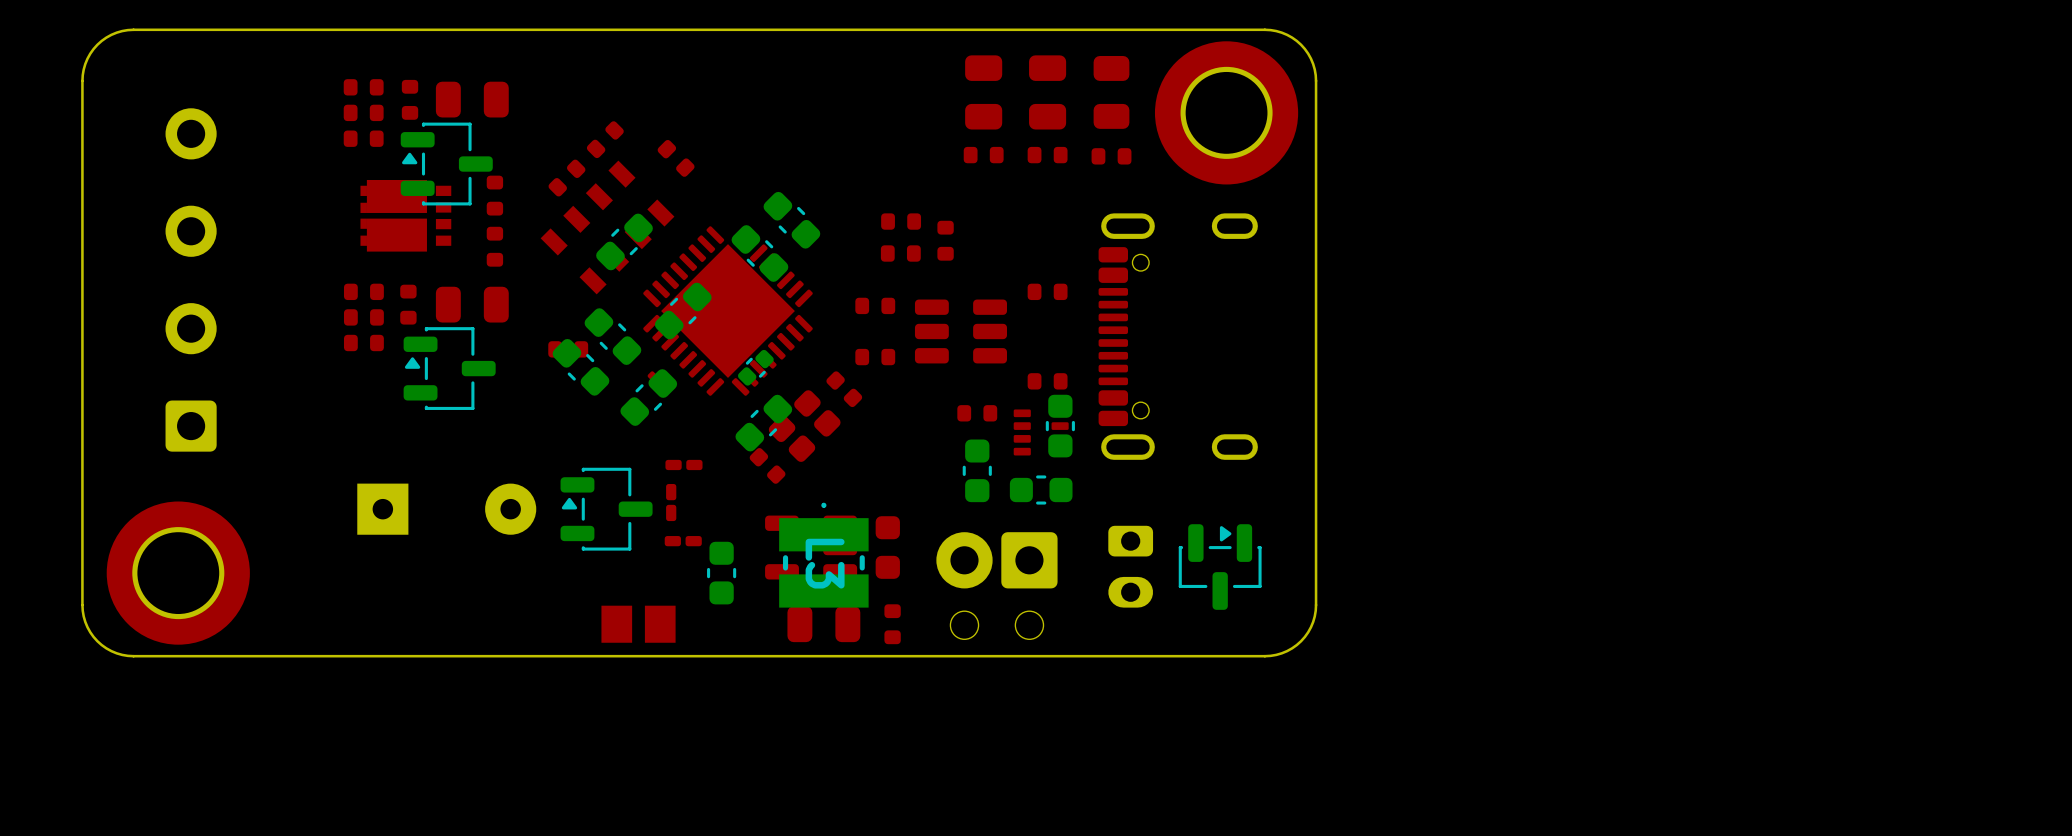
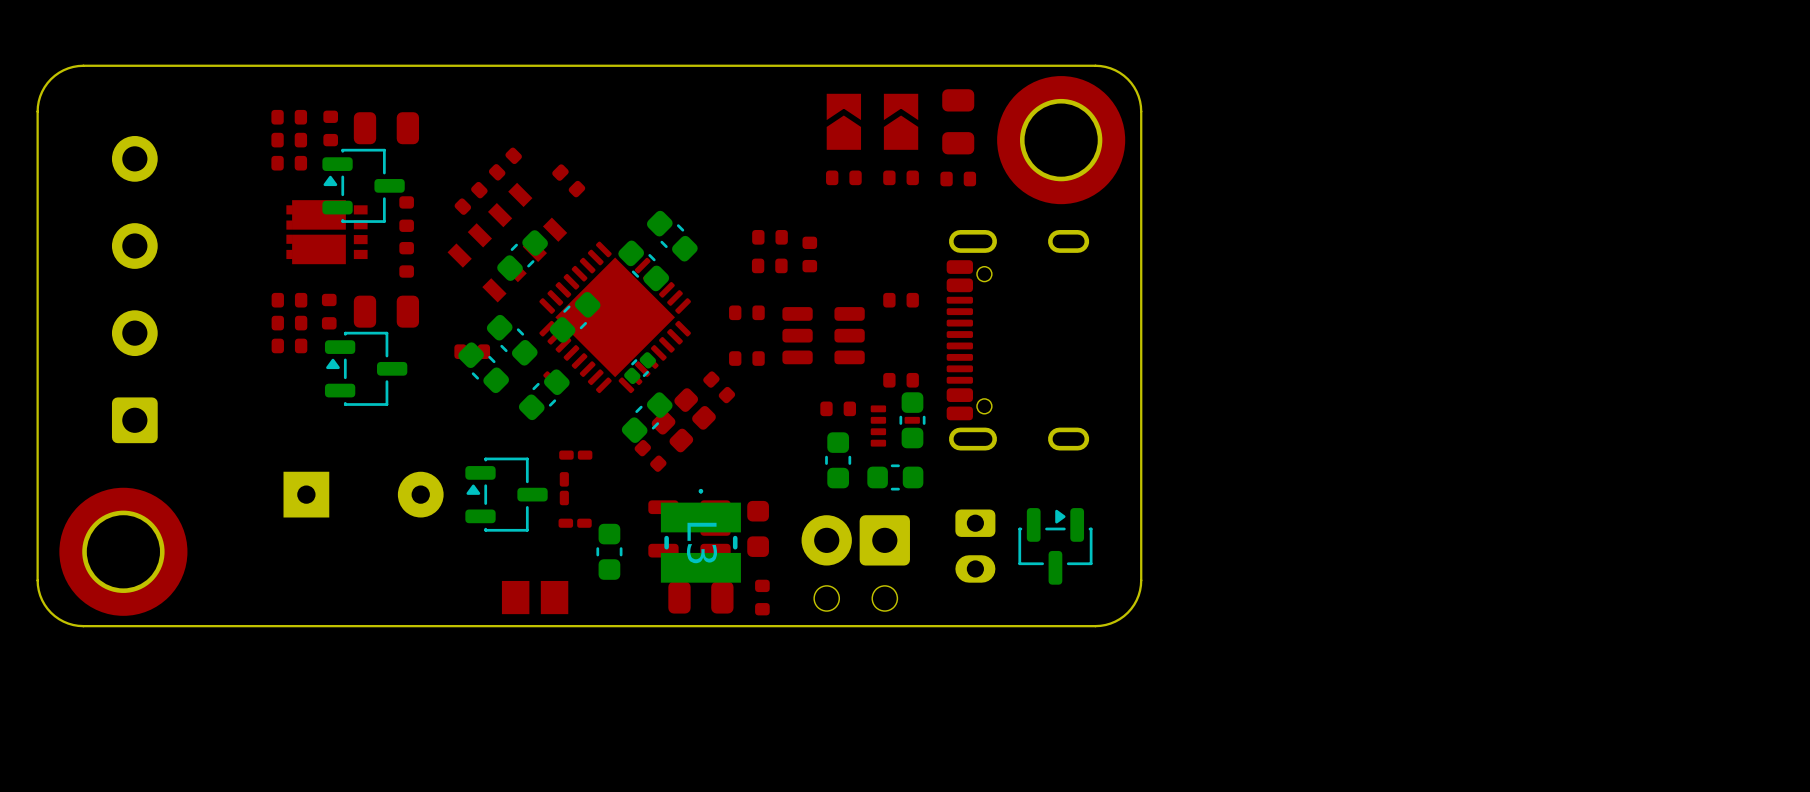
part footprint: [965, 55, 1003, 130] -> [826, 93, 862, 150]
part footprint: [1029, 55, 1067, 130] -> [883, 93, 919, 150]

